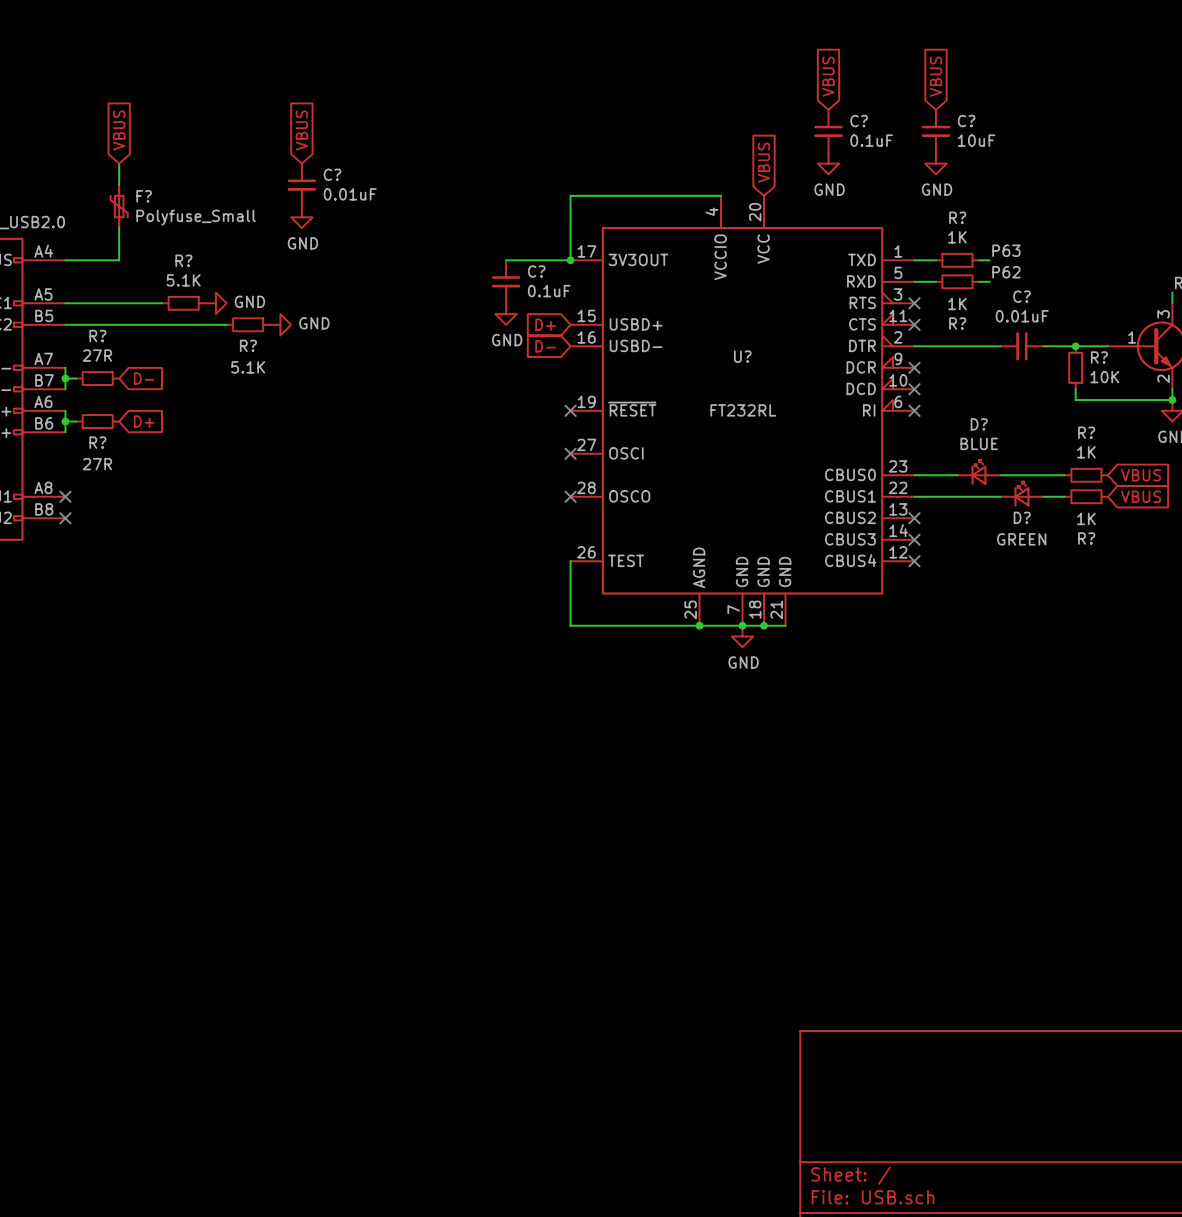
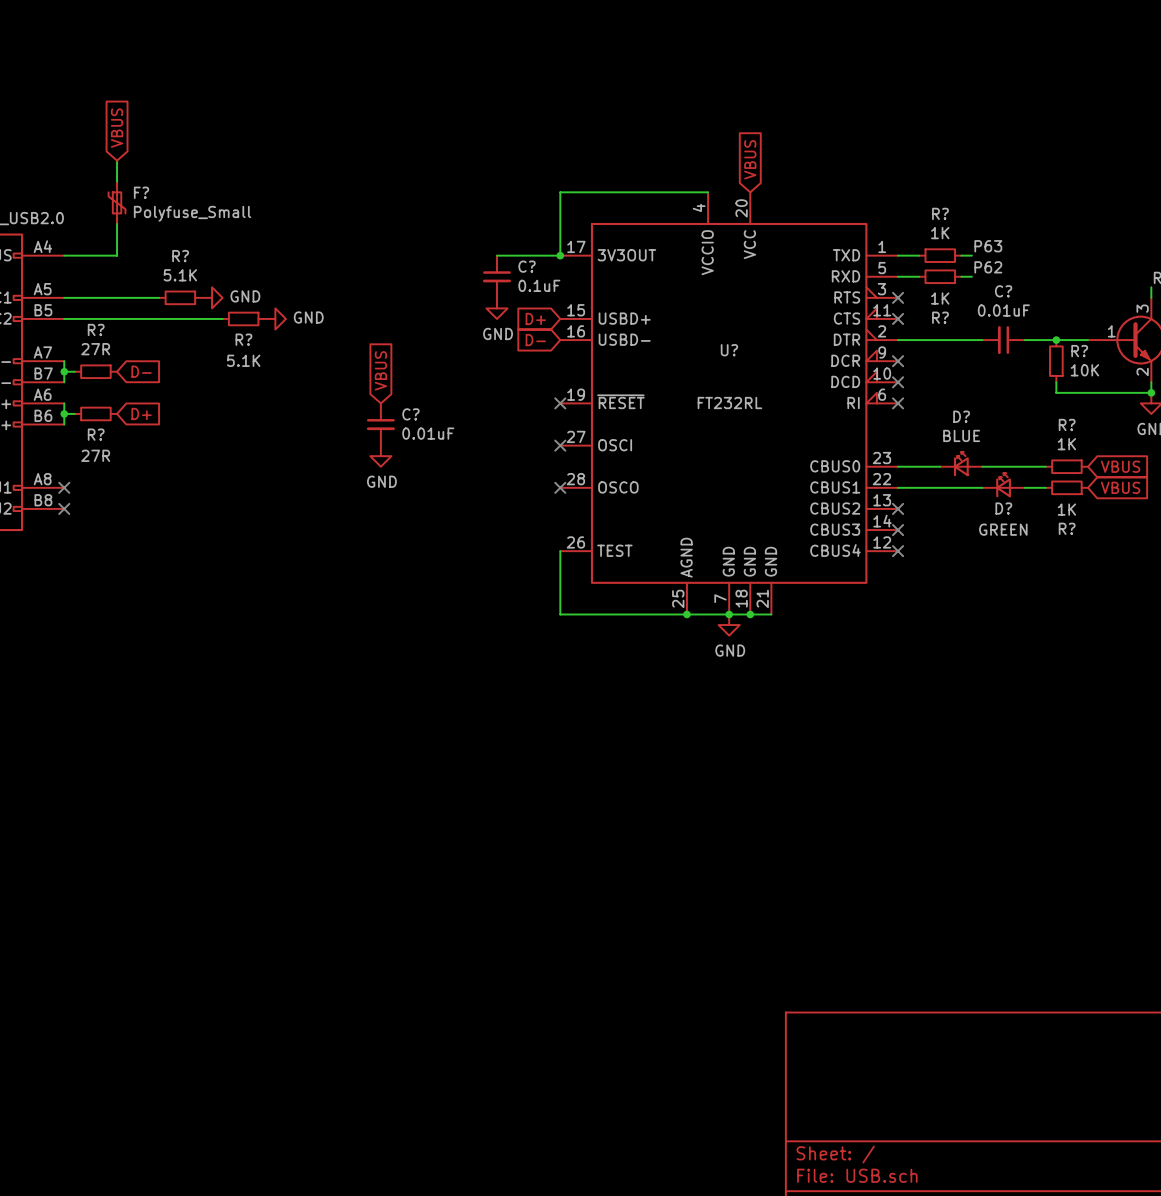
global label: VBUS (828, 76) -> none
global label: VBUS (935, 76) -> none
global label: VBUS (301, 130) -> none
C?: 0.1uF (828, 131) -> none
C?: 10uF (935, 131) -> none
power symbol: GND (828, 163) -> none
power symbol: GND (935, 163) -> none
C?: 0.01uF (301, 185) -> none
power symbol: GND (301, 217) -> none
global label: none -> VBUS (380, 370)
C?: none -> 0.01uF (380, 424)
power symbol: none -> GND (380, 456)

